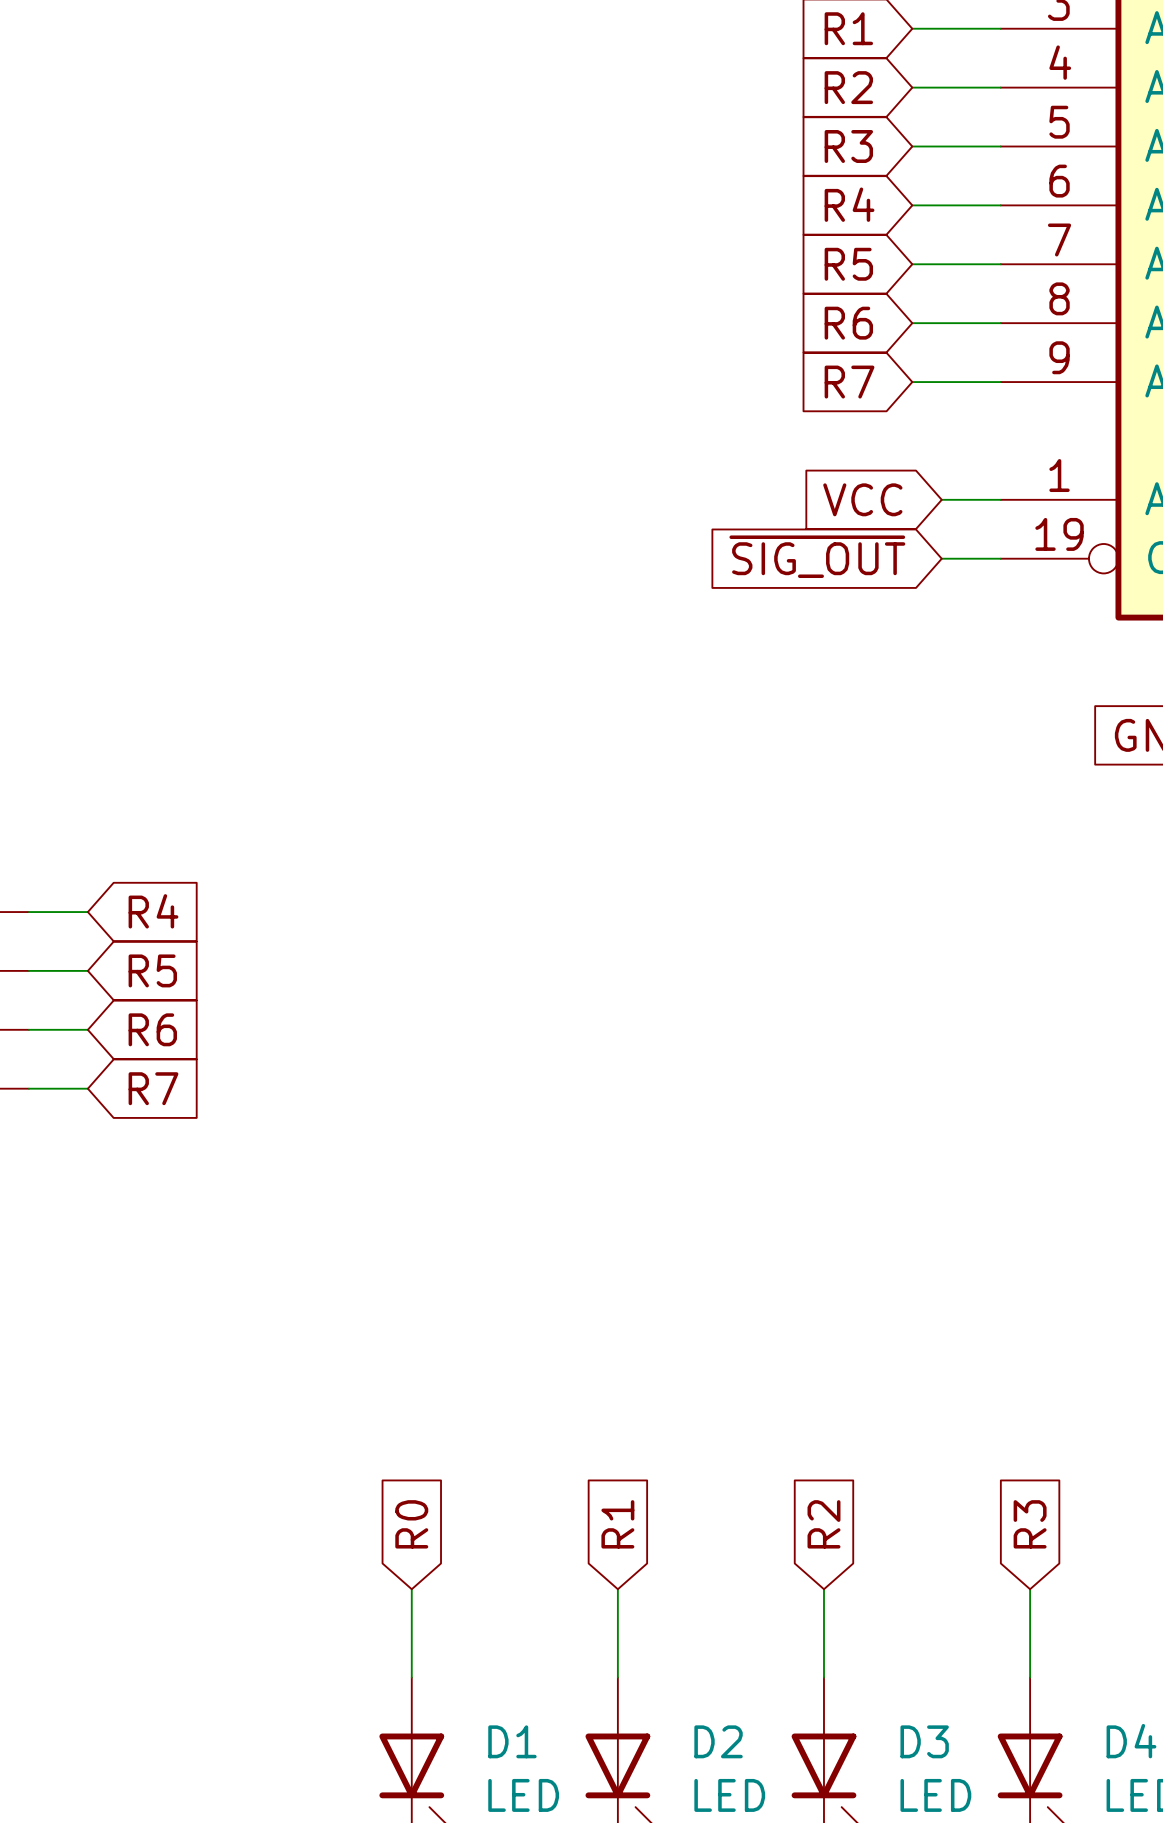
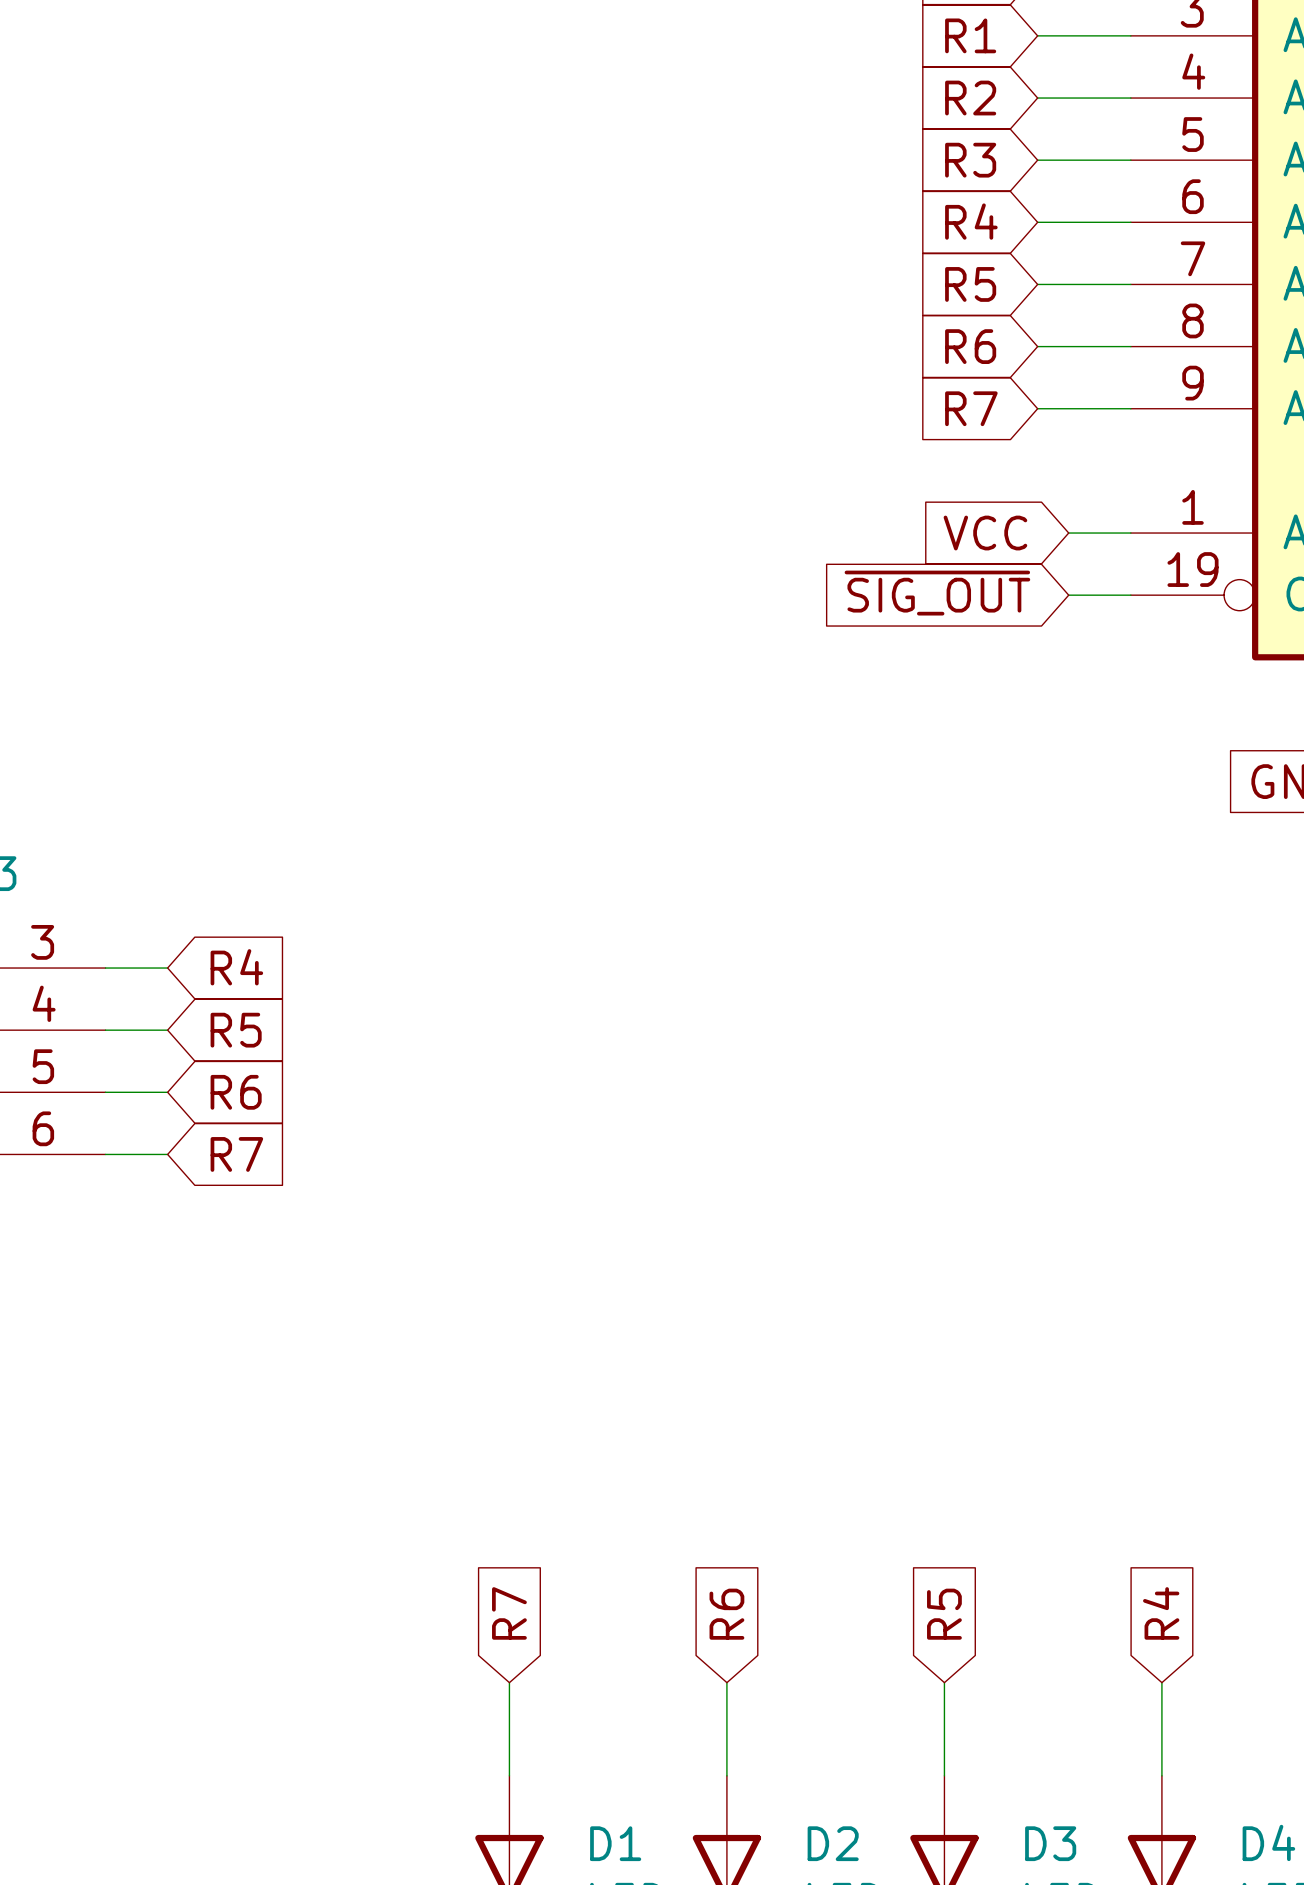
global label: R0 (411, 1524) -> R7 (509, 1613)
global label: R1 (617, 1524) -> R6 (726, 1614)
global label: R2 (823, 1524) -> R5 (944, 1614)
global label: R3 (1030, 1524) -> R4 (1161, 1613)

